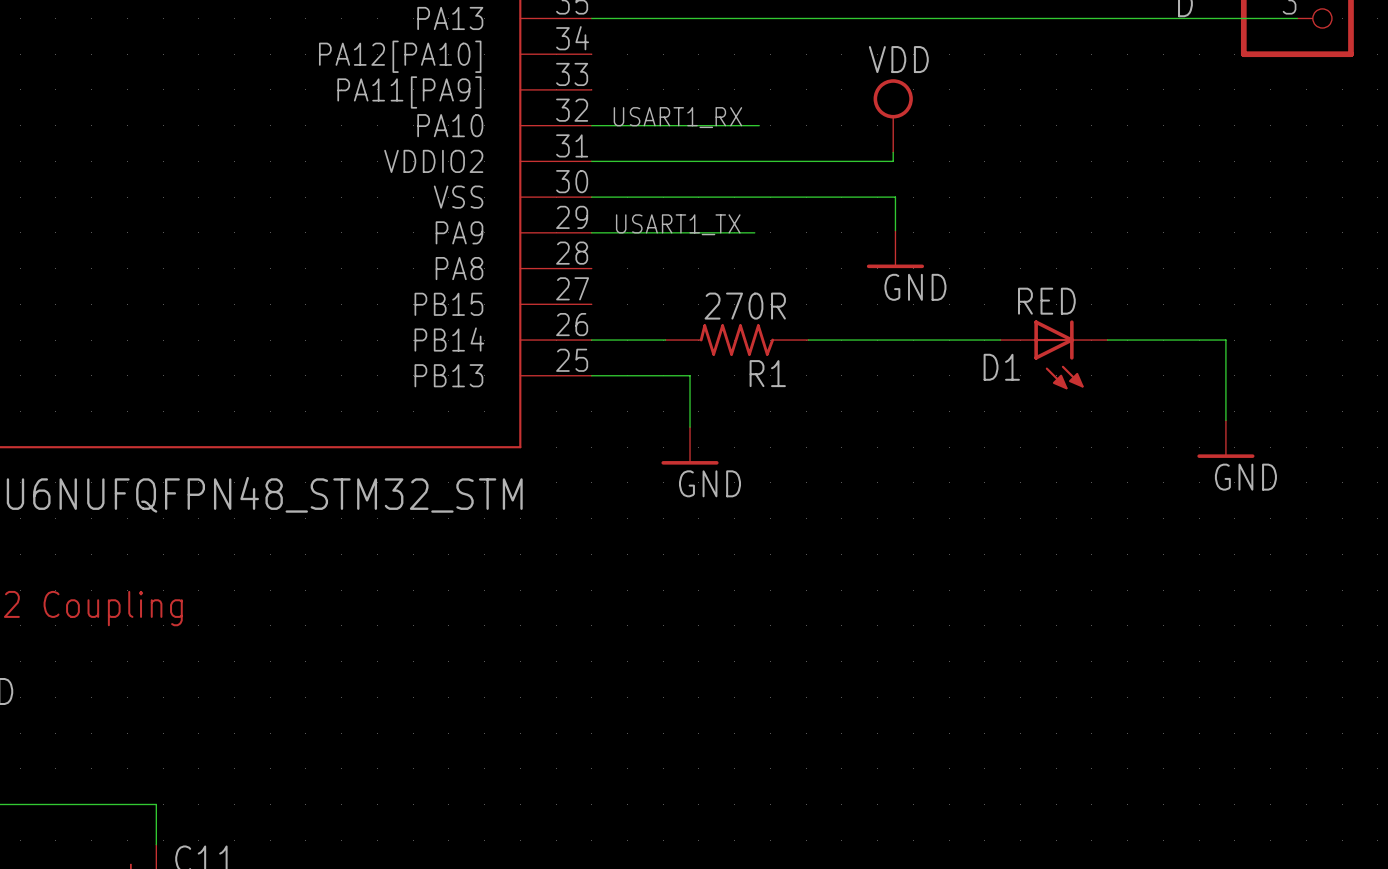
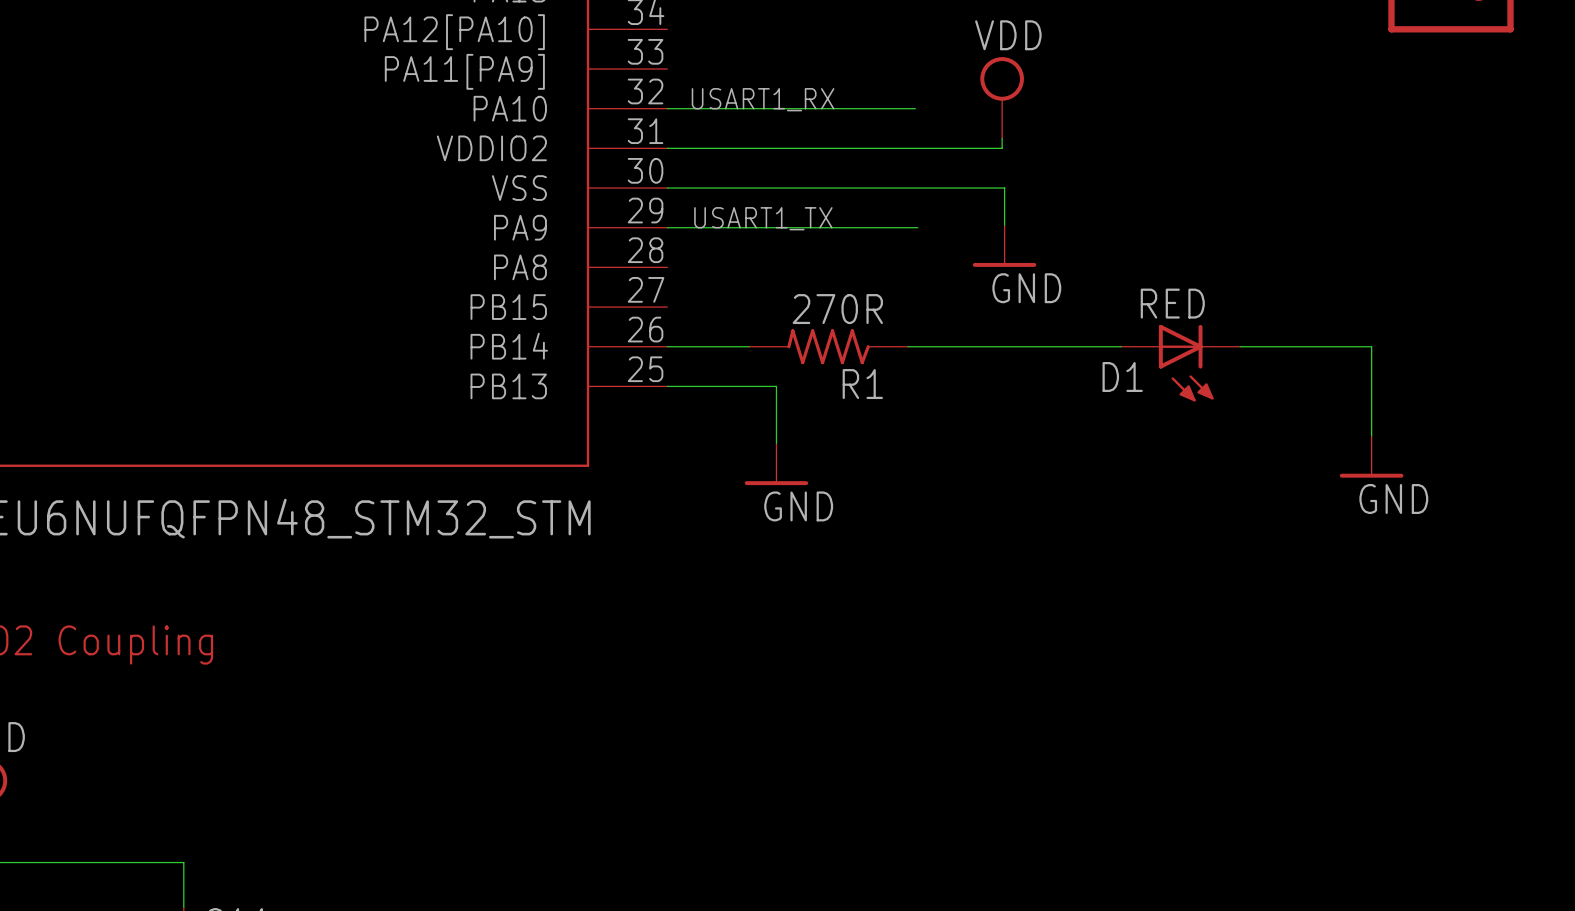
wire: none -> (853, 108) (915, 108)
wire: none -> (848, 227) (917, 227)

